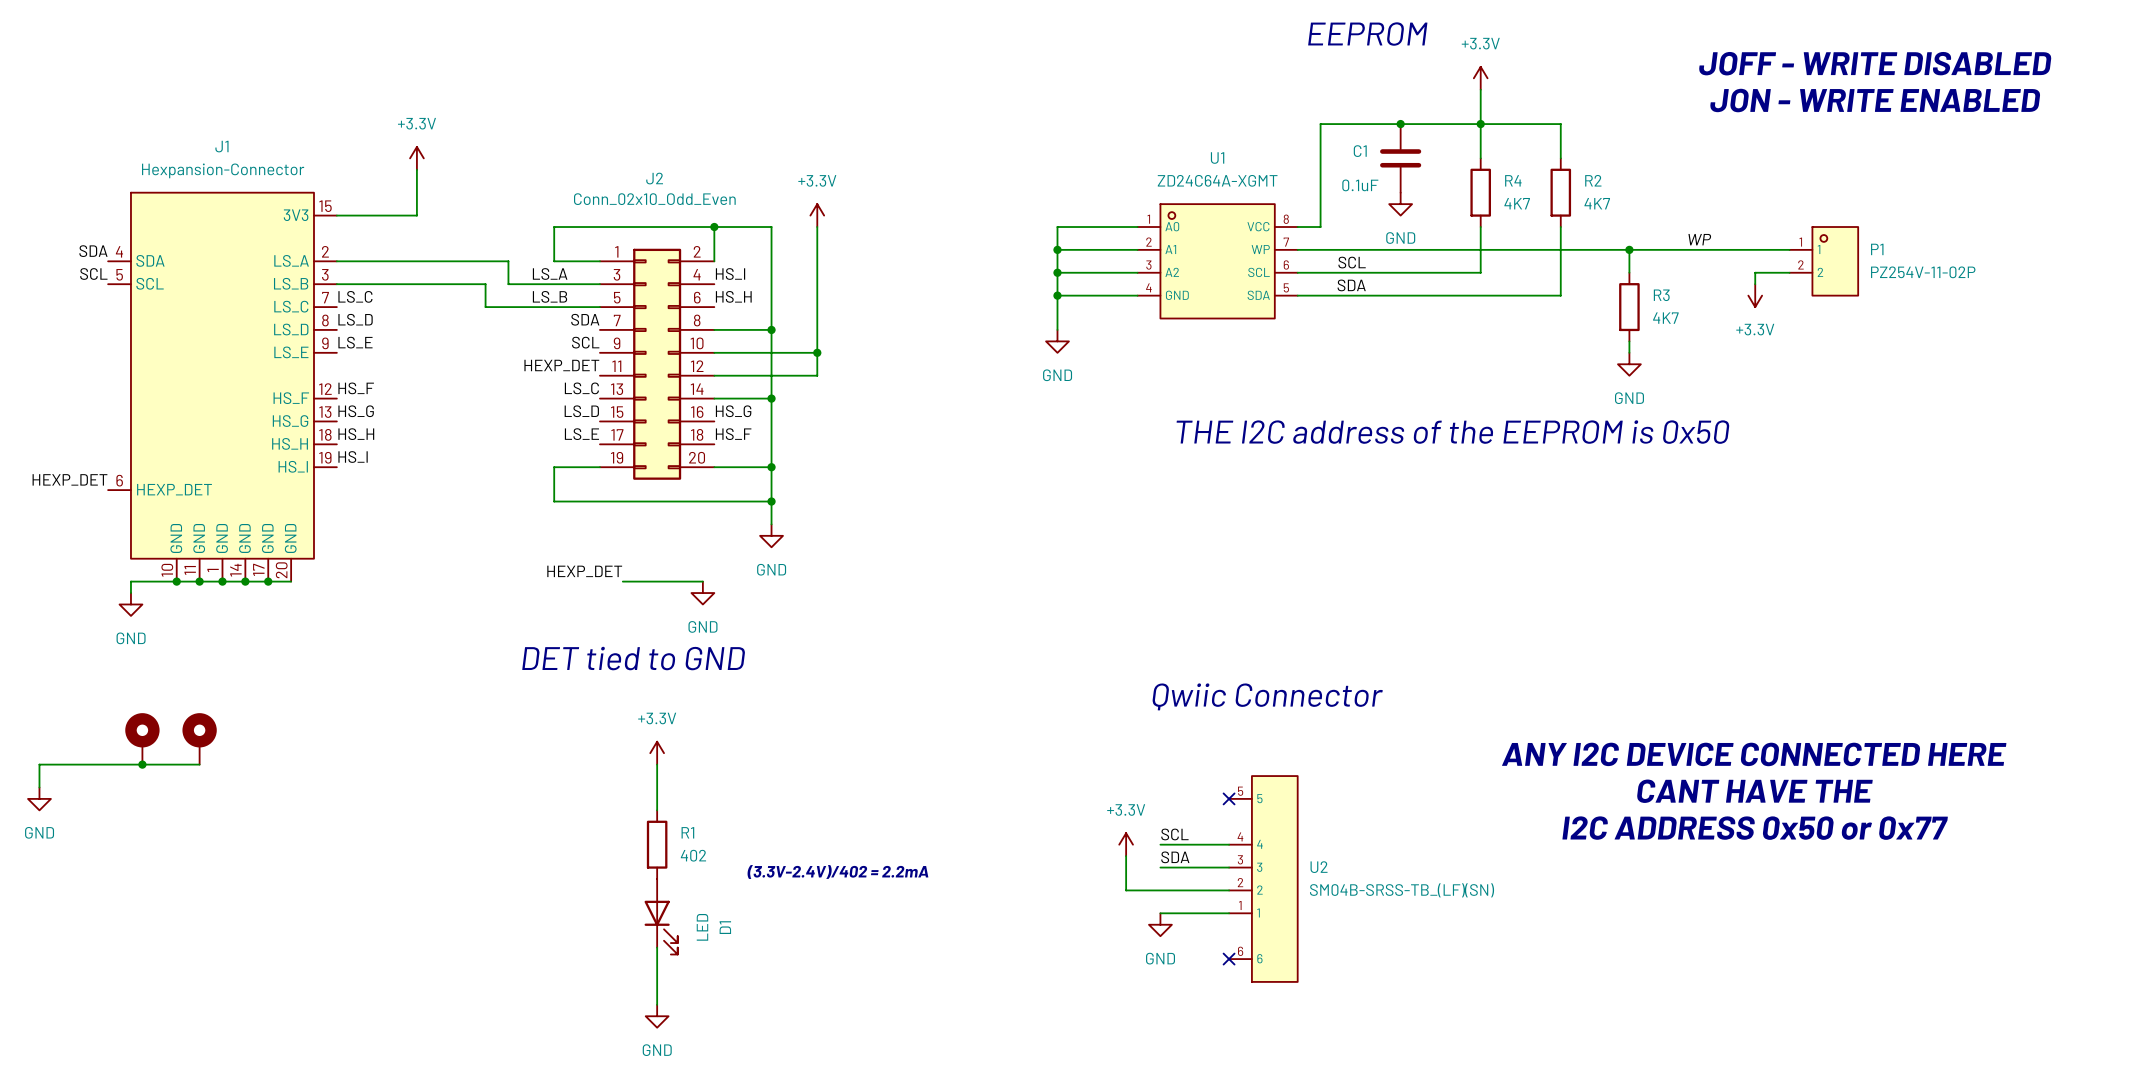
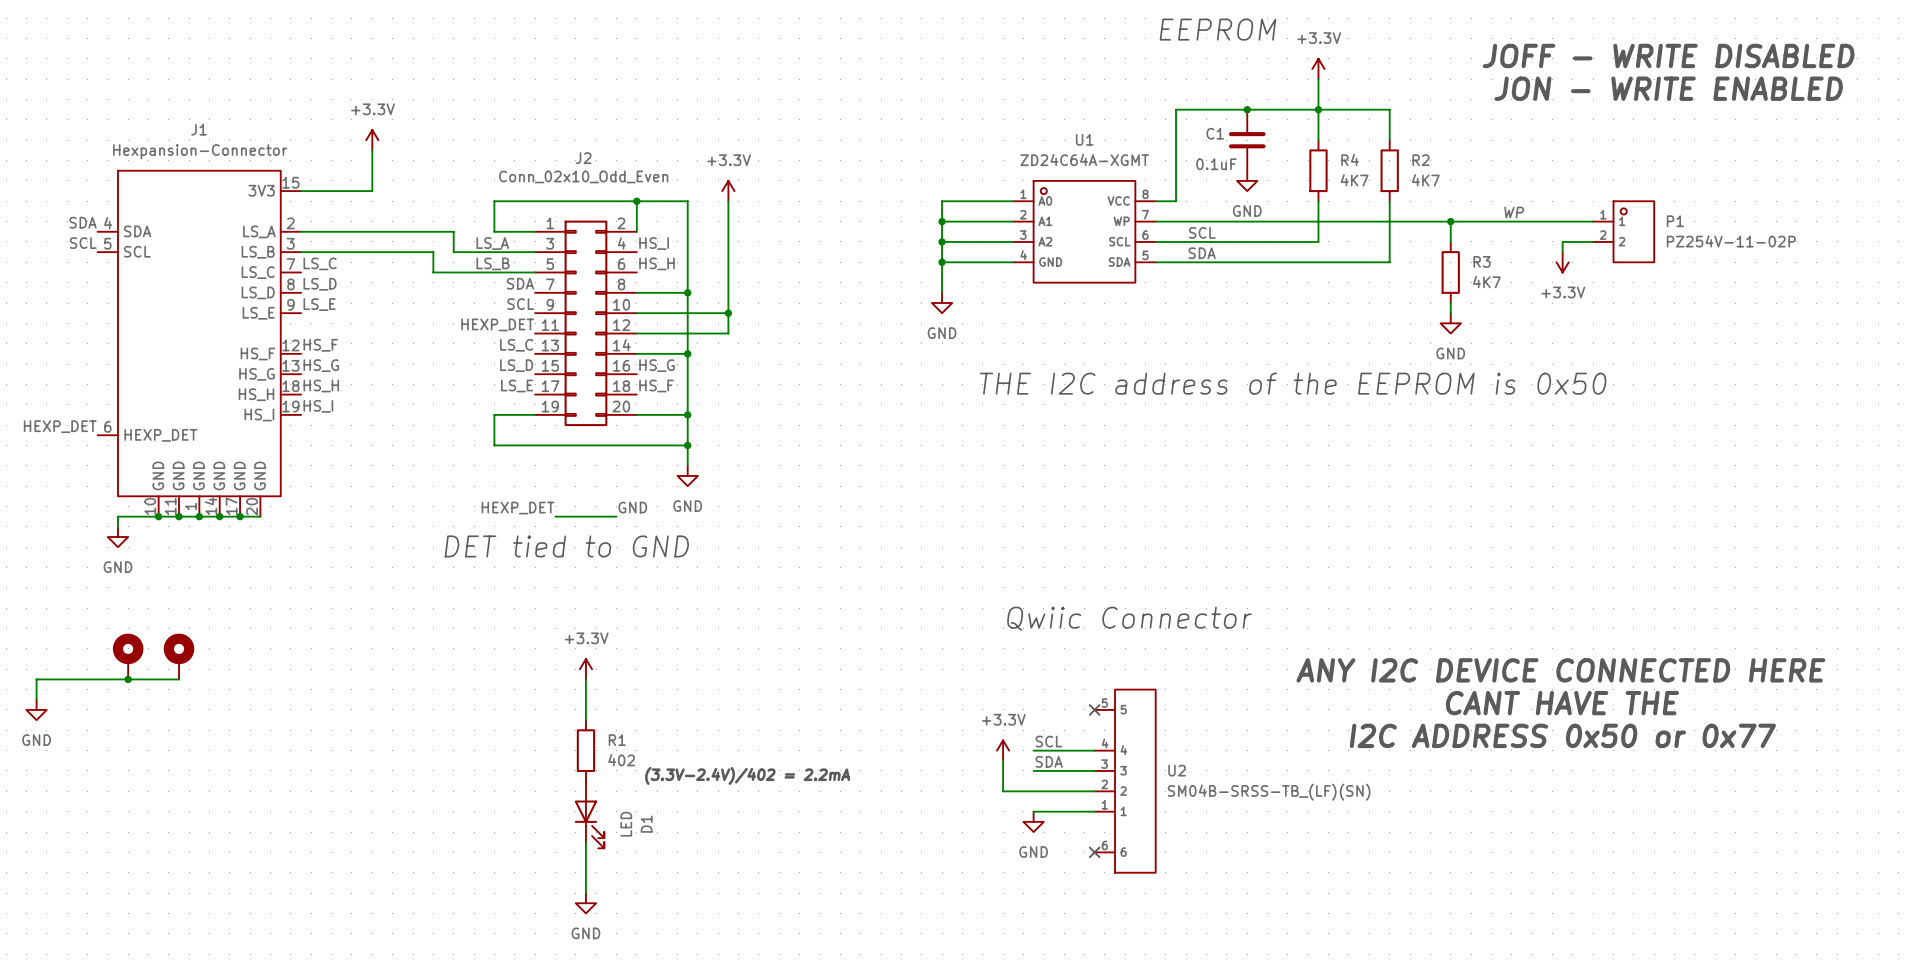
label: none -> GND (632, 507)
wire: (691, 581) (702, 581) -> none
power symbol: GND (702, 593) -> none
text position: DET tied to GND (633, 658) -> DET tied to GND (566, 546)

